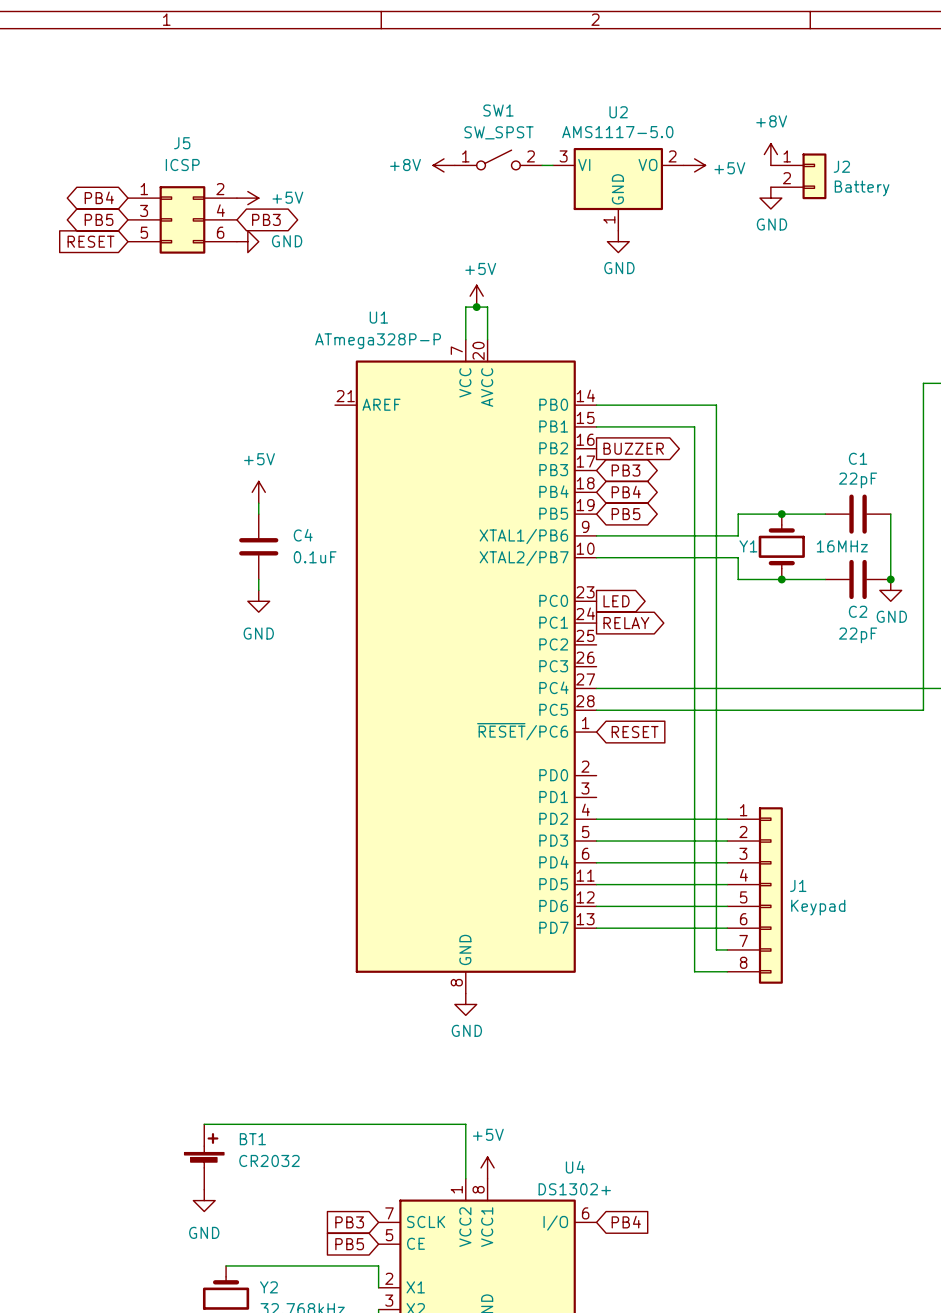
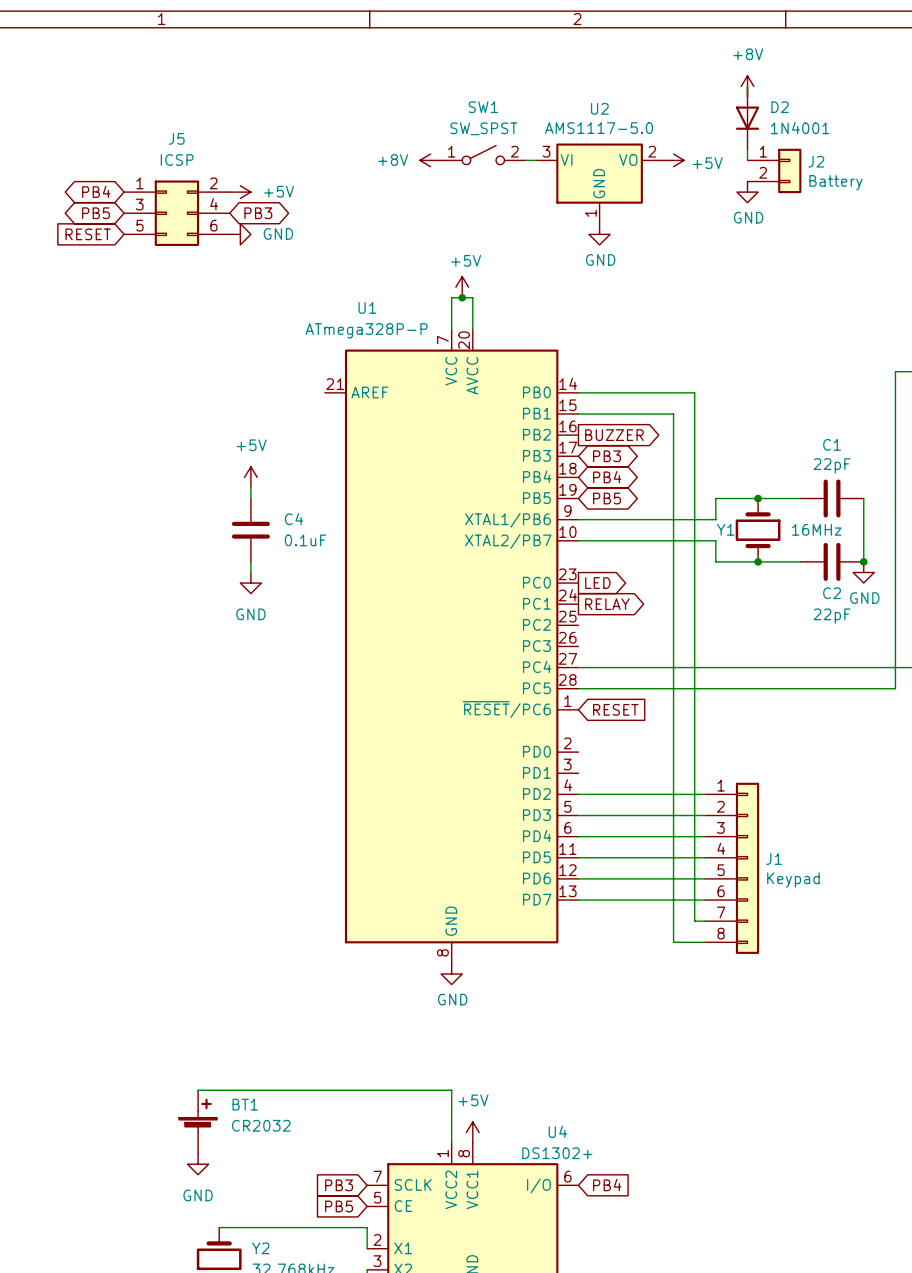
wire: none -> (747, 86) (747, 97)
D2: none -> 1N4001 (747, 118)
power symbol position: +8V (770, 154) -> +8V (747, 86)

